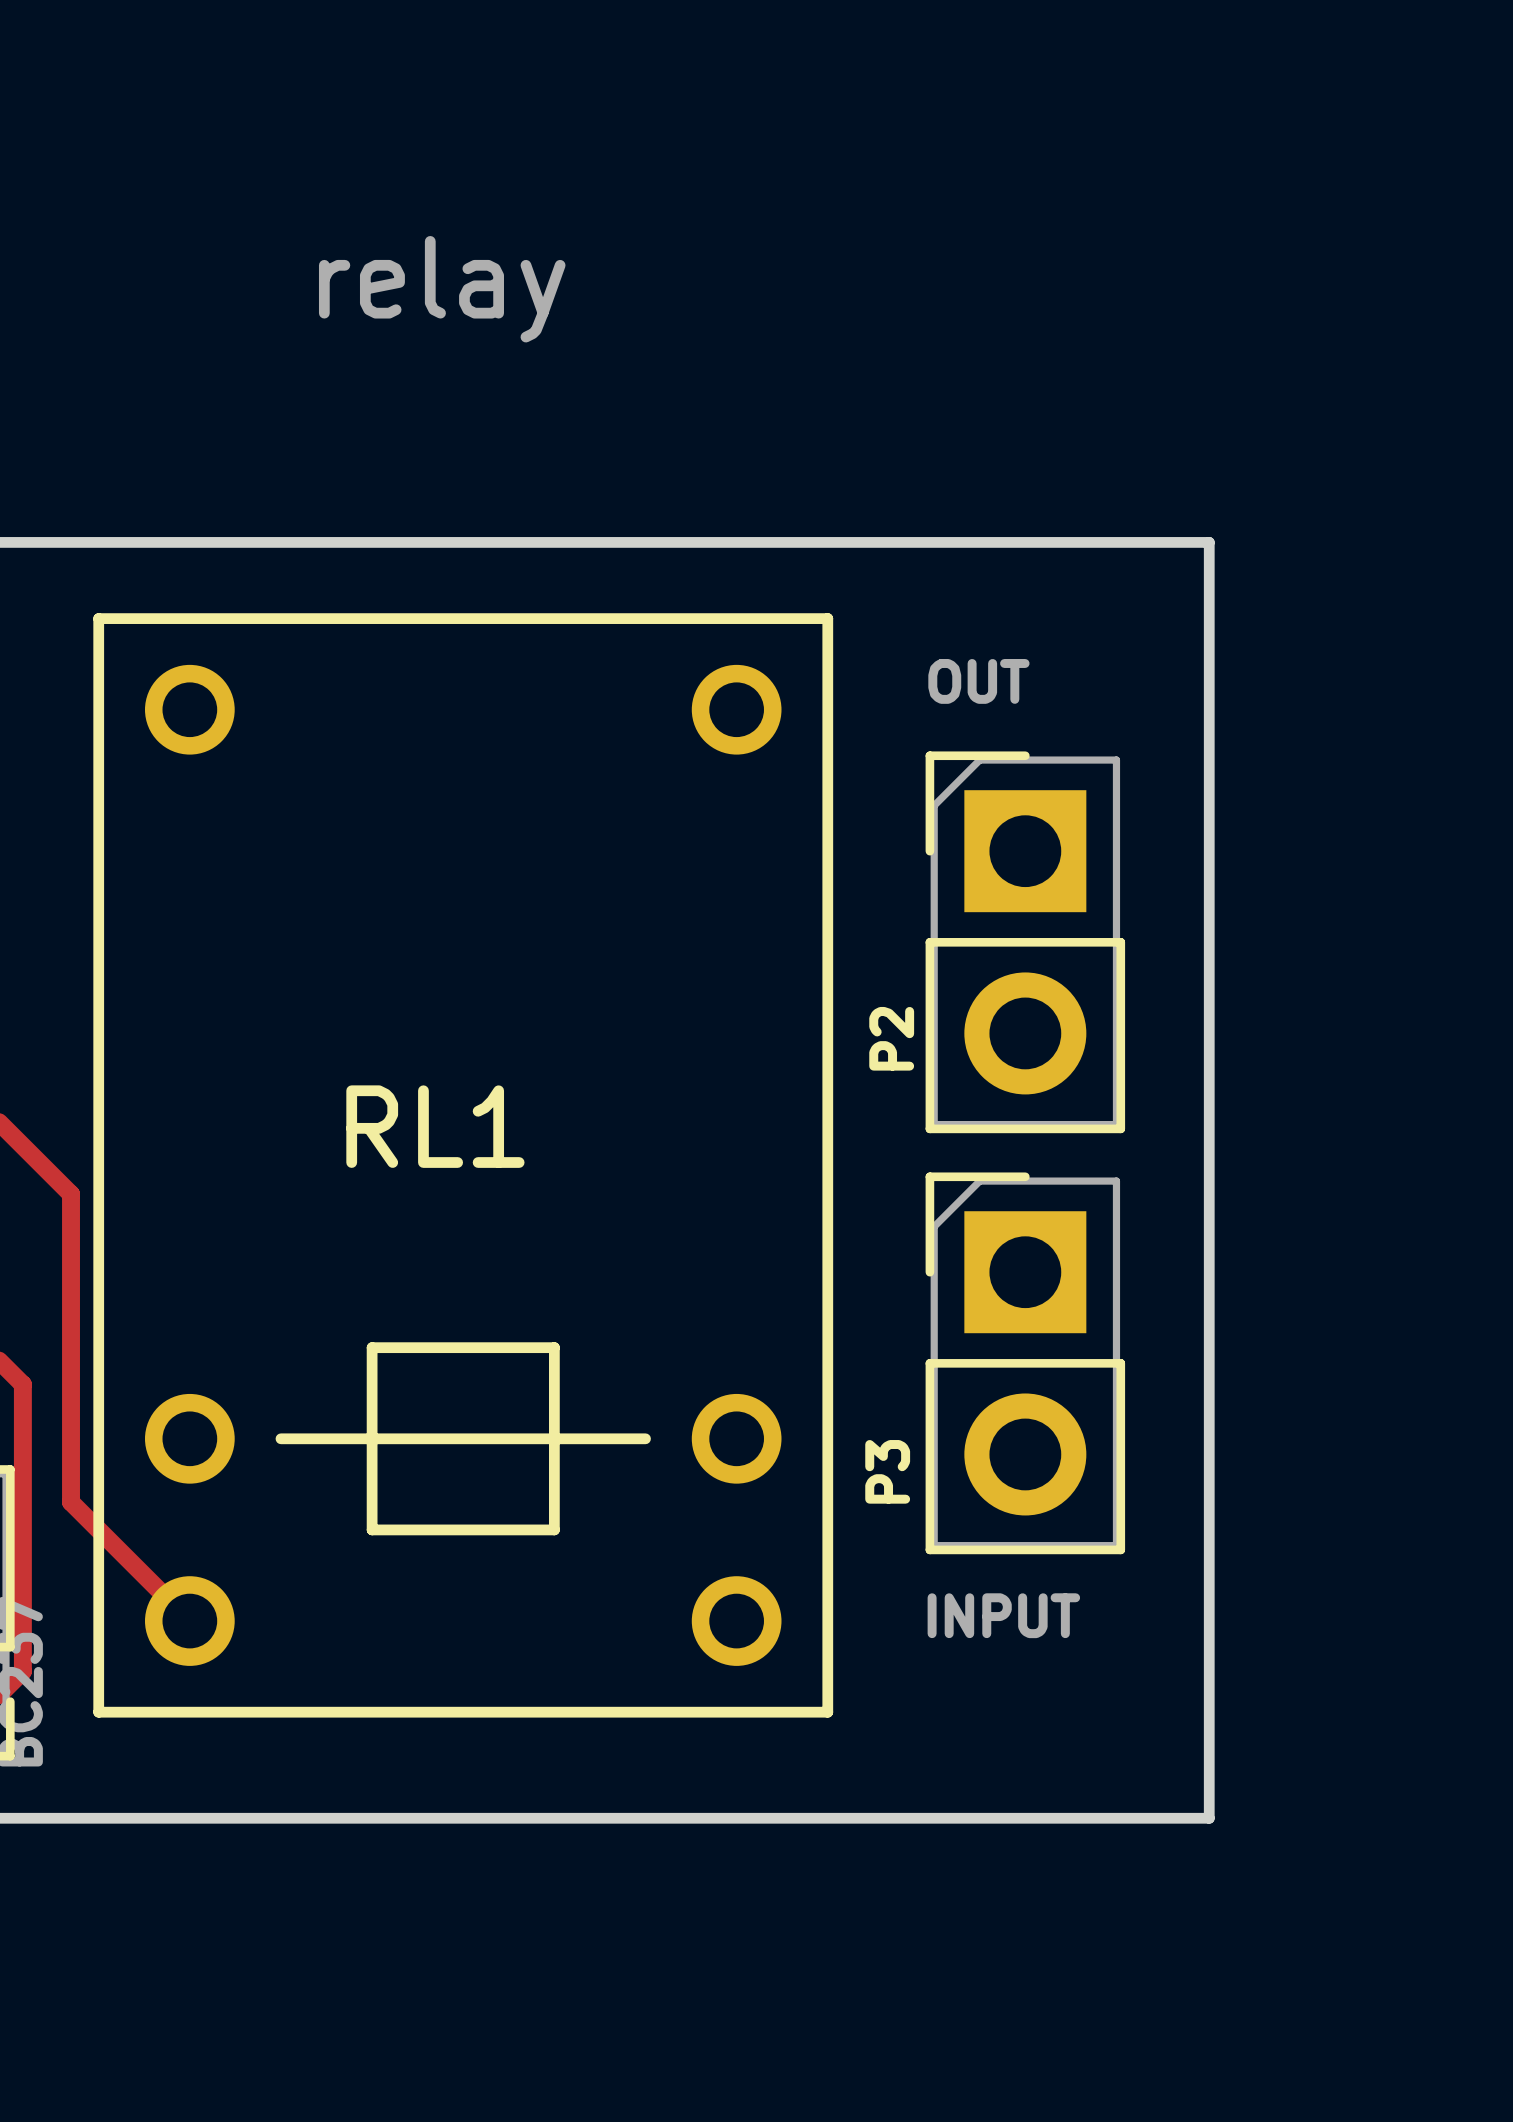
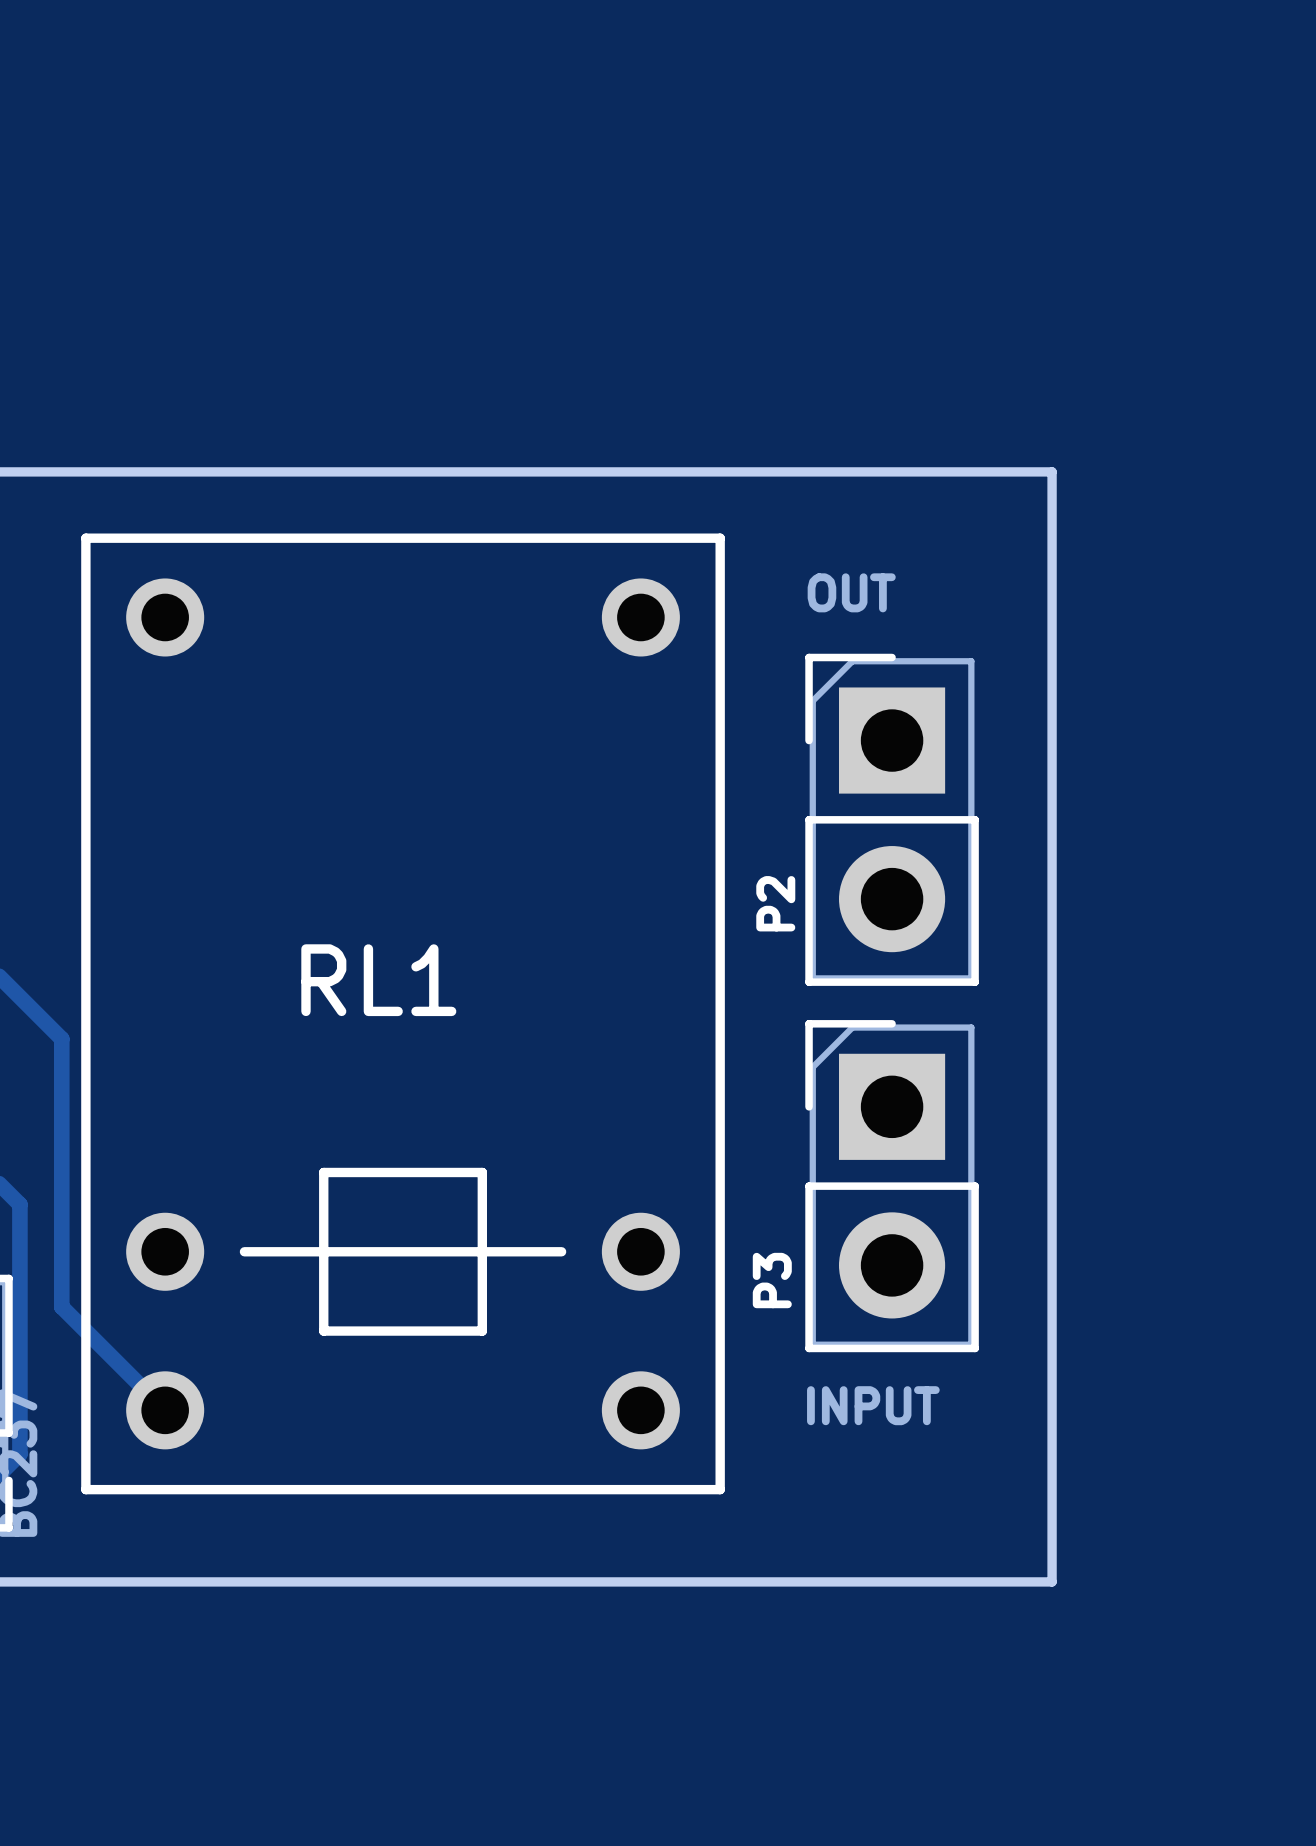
RL1 value: relay (442, 289) -> none

